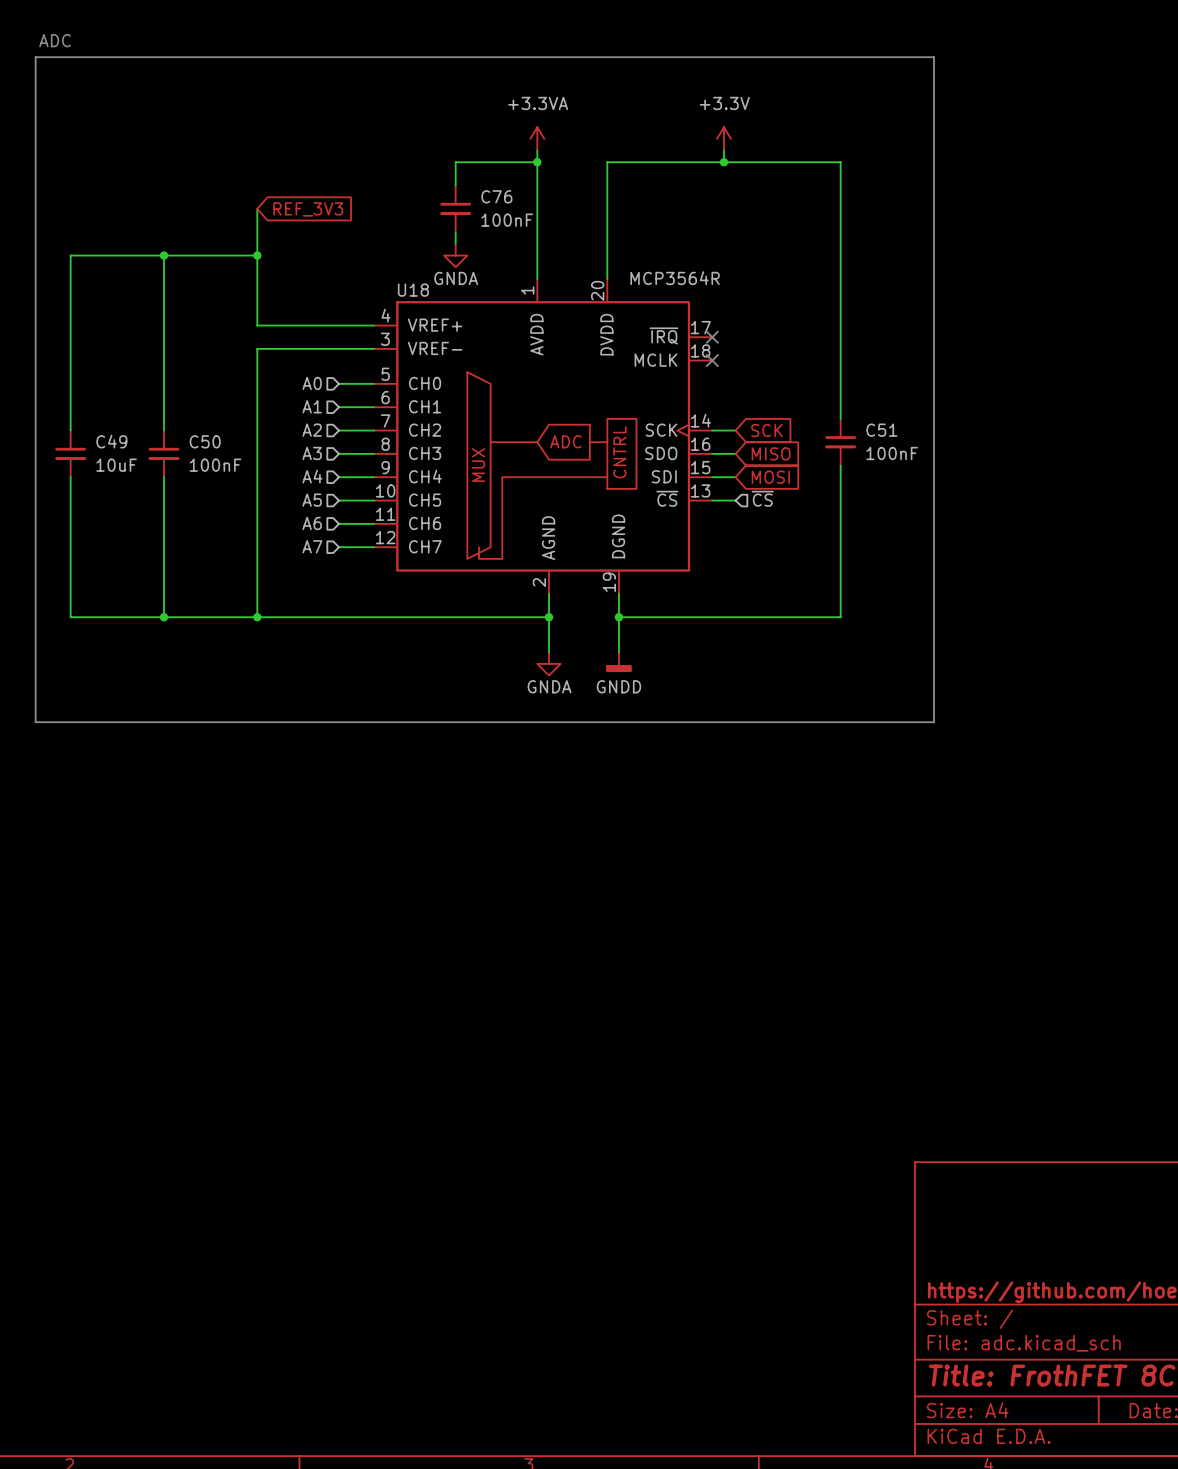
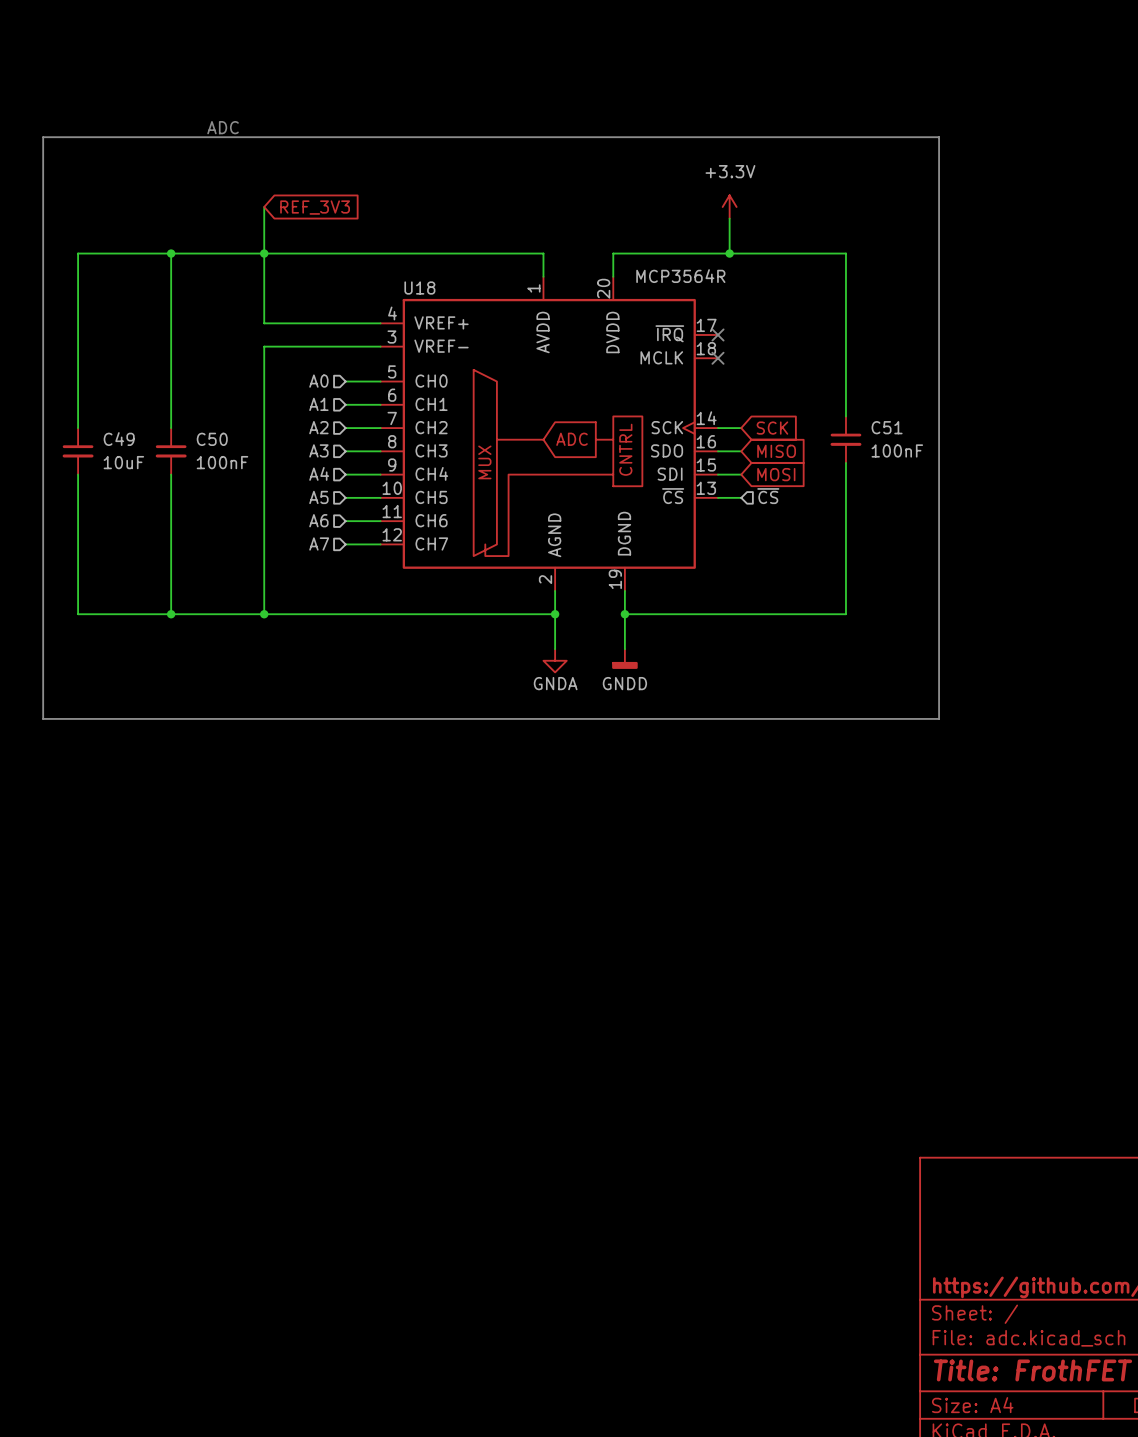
text position: ADC (55, 40) -> ADC (223, 127)
line: (35, 138) (35, 57) (933, 57) (933, 138) -> (43, 137) (939, 137)
power symbol: +3.3VA (537, 138) -> none
power symbol position: +3.3V (723, 138) -> +3.3V (729, 207)
wire: (537, 150) (537, 255) -> (264, 253) (543, 253)
wire: (723, 150) (723, 162) -> none
wire: (537, 162) (455, 162) (455, 185) -> none
junction: (537, 162) -> none
junction: (723, 162) -> none
C76: 100nF (455, 208) -> none
wire: none -> (729, 218) (729, 253)
wire: (455, 232) (455, 243) -> none
power symbol: GNDA (455, 255) -> none
wire: (607, 255) (607, 162) (840, 162) (840, 255) -> (613, 253) (845, 253)
junction: none -> (729, 253)

